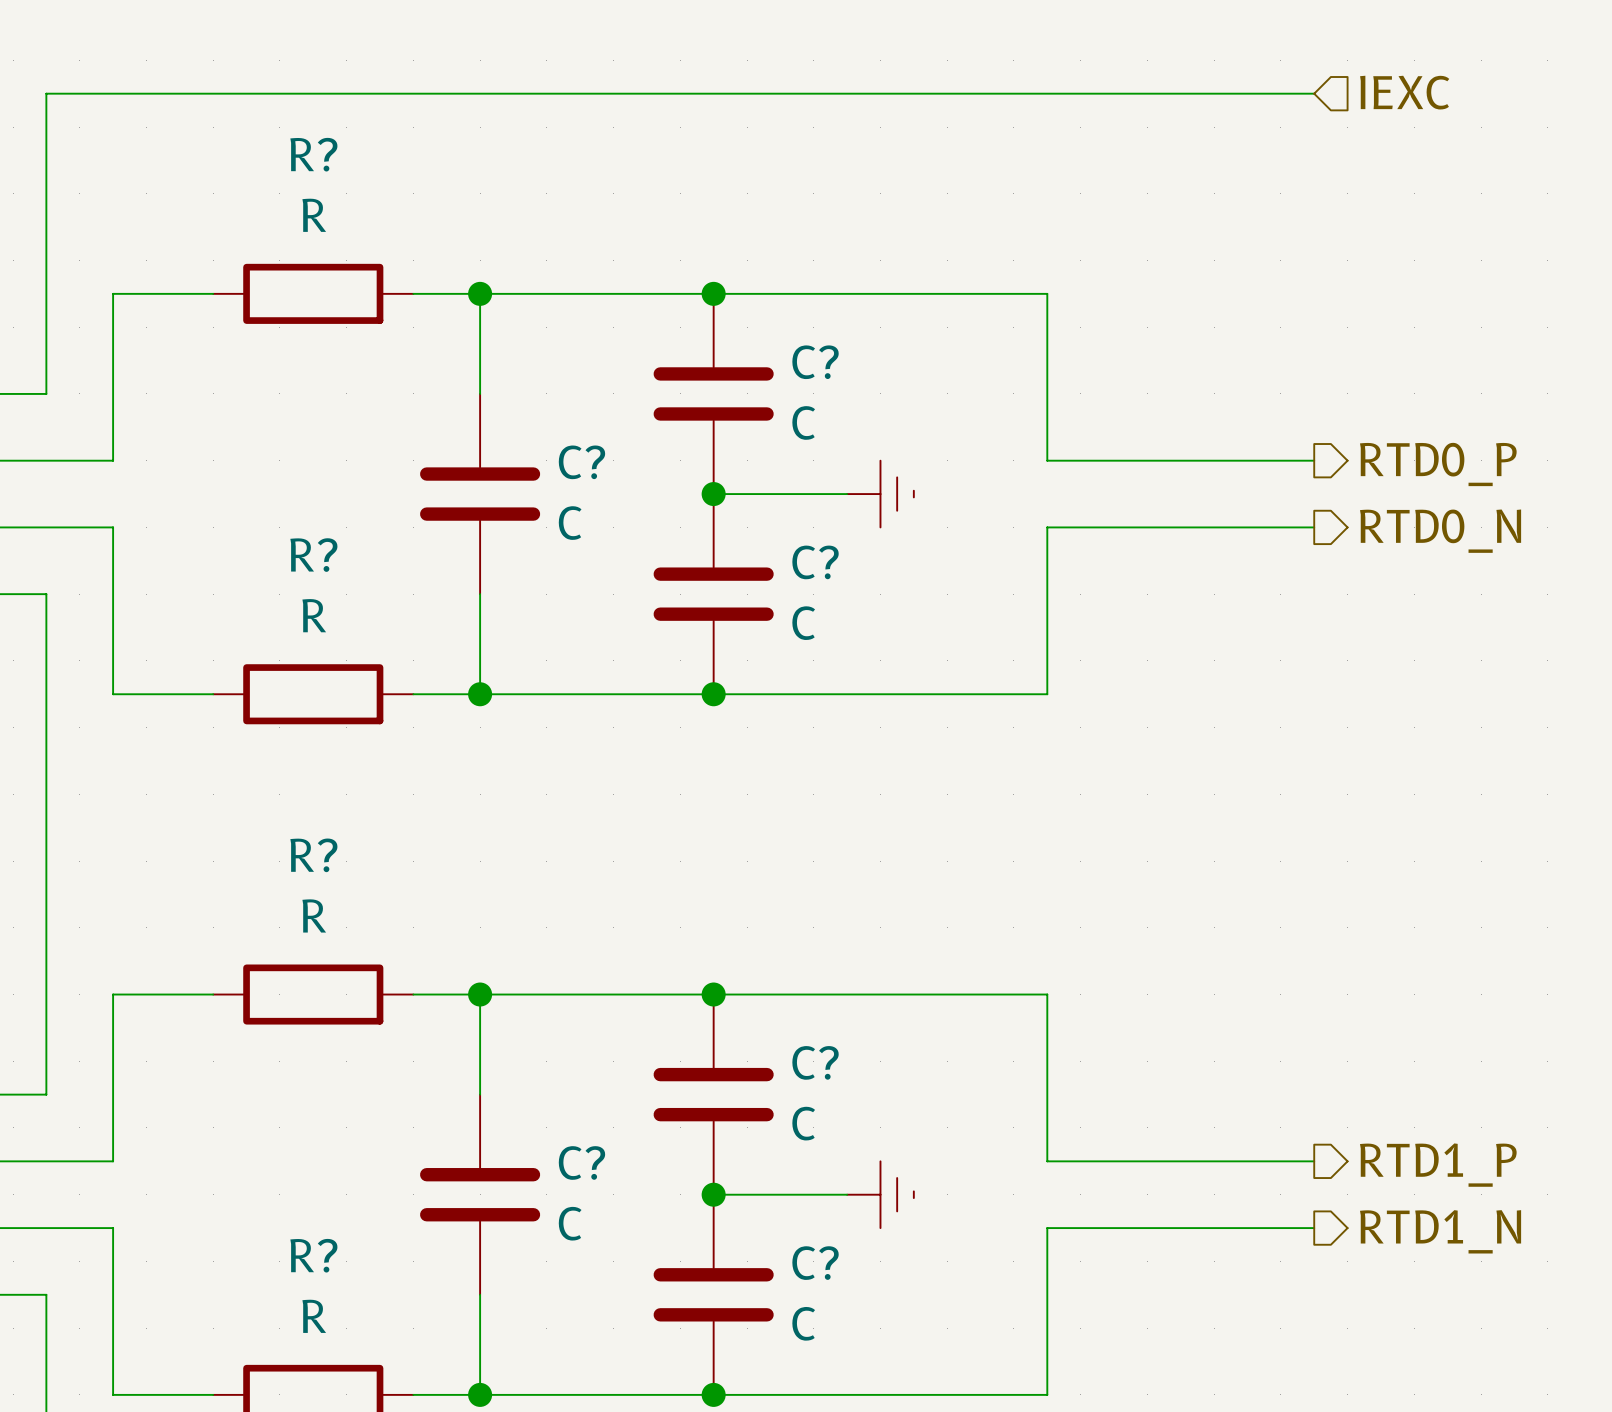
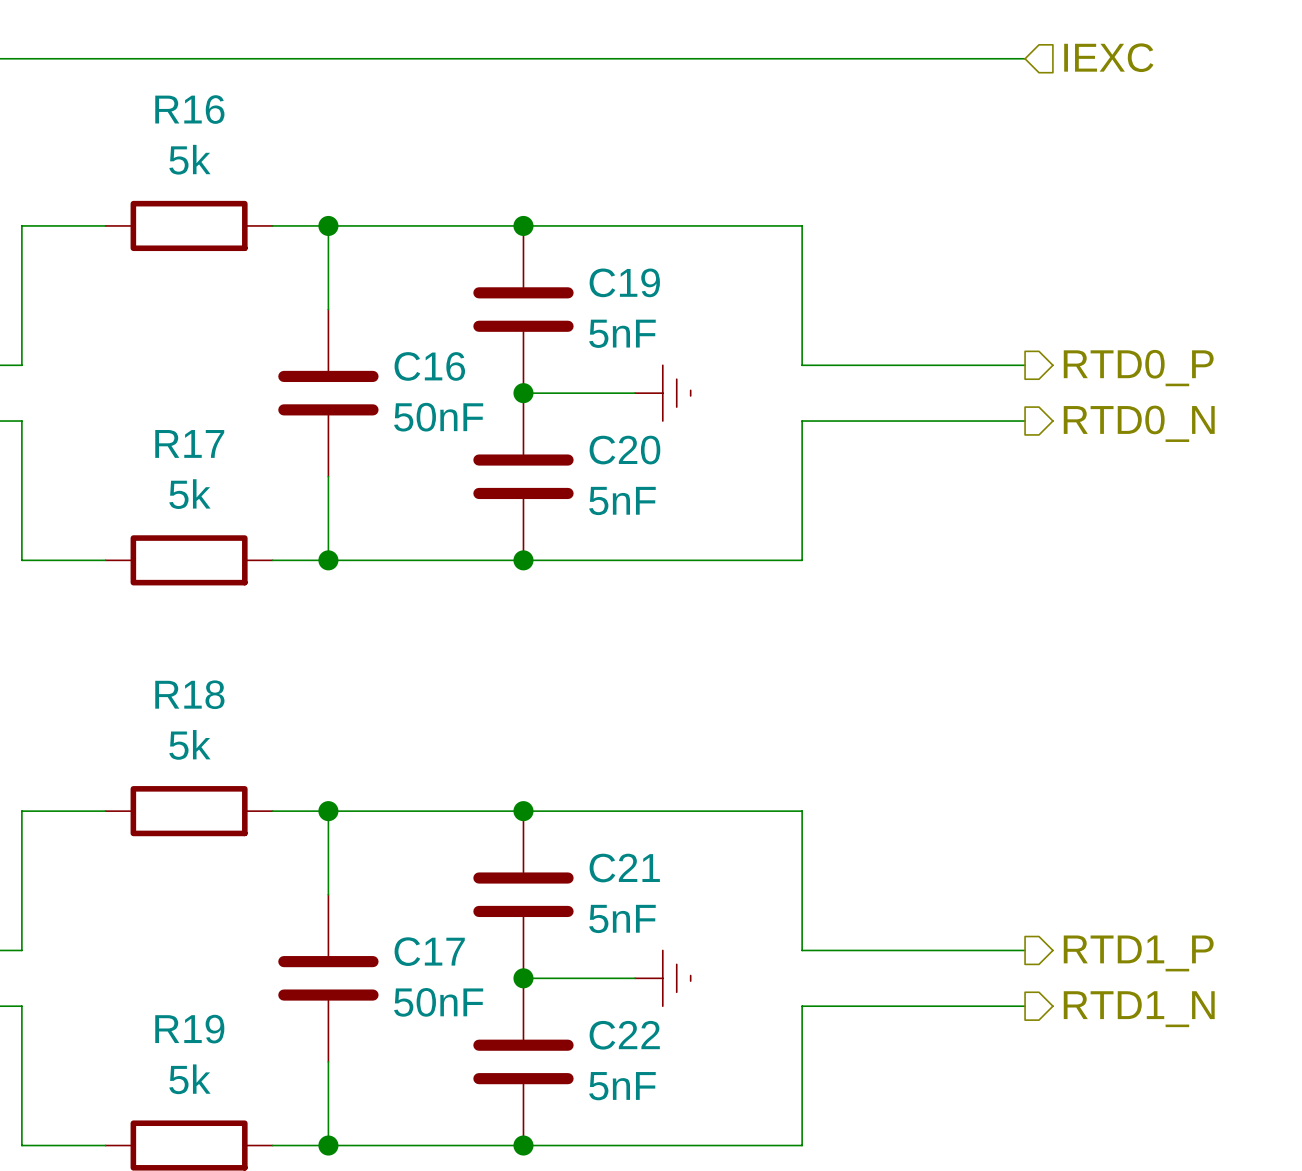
R? name: R? (313, 154) -> R16 (189, 109)
R? value: R (314, 215) -> 5k (189, 159)
C? name: C? (815, 362) -> C19 (624, 282)
C? value: C (803, 422) -> 5nF (622, 333)
C? name: C? (581, 462) -> C16 (429, 366)
C? value: C (570, 523) -> 50nF (438, 417)
R? name: R? (313, 555) -> R17 (189, 443)
C? name: C? (815, 562) -> C20 (624, 450)
R? value: R (314, 615) -> 5k (189, 494)
C? value: C (803, 623) -> 5nF (622, 500)
R? name: R? (313, 855) -> R18 (189, 694)
R? value: R (314, 915) -> 5k (189, 744)
C? name: C? (815, 1062) -> C21 (624, 868)
C? value: C (803, 1123) -> 5nF (622, 918)
C? name: C? (581, 1162) -> C17 (429, 951)
C? value: C (570, 1223) -> 50nF (438, 1002)
R? name: R? (313, 1255) -> R19 (189, 1029)
C? name: C? (815, 1263) -> C22 (624, 1035)
R? value: R (314, 1316) -> 5k (189, 1079)
C? value: C (803, 1323) -> 5nF (622, 1086)

